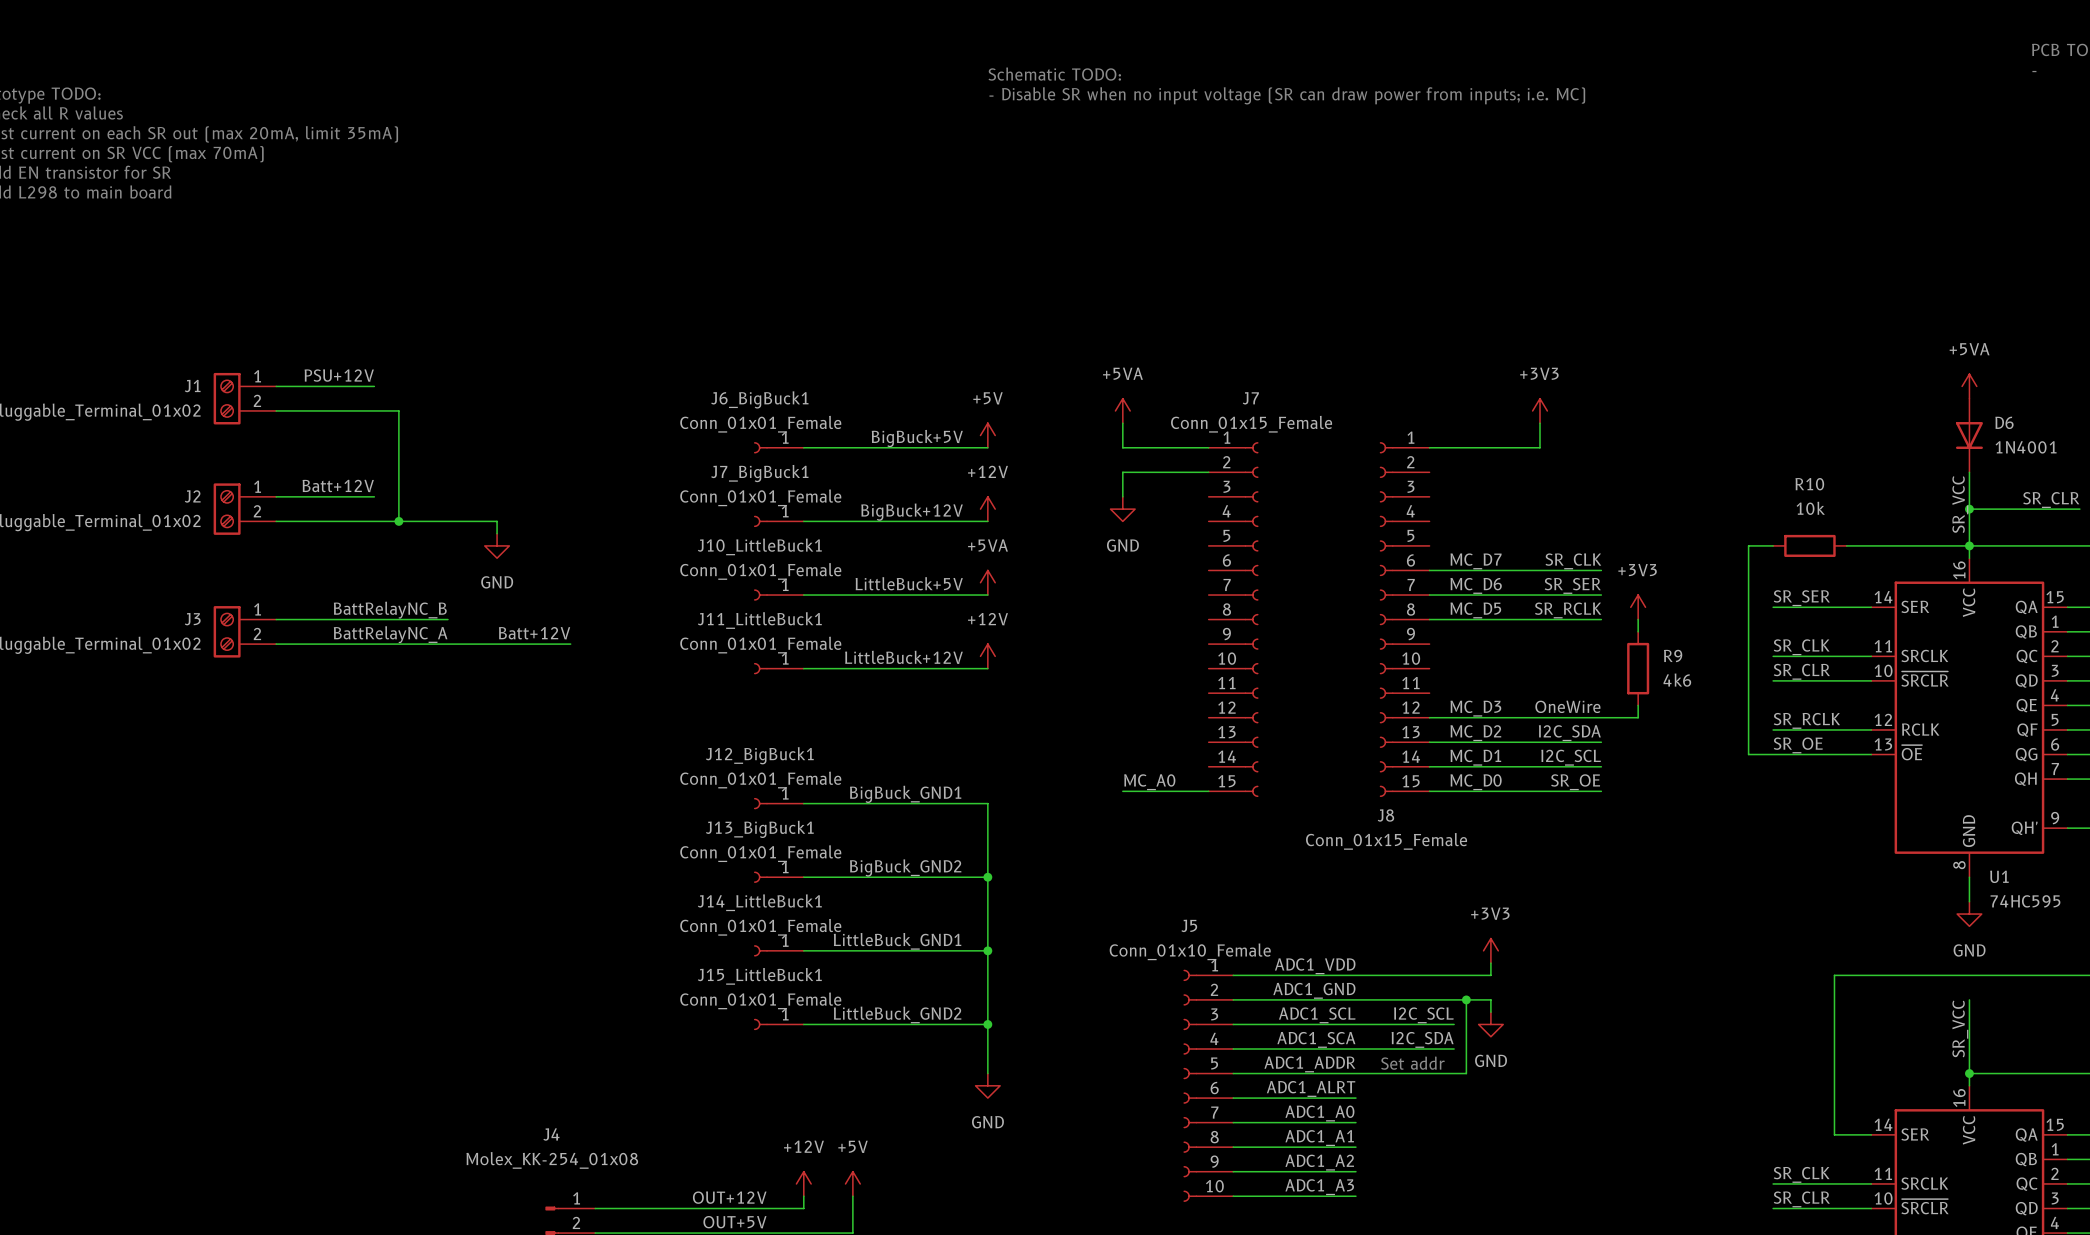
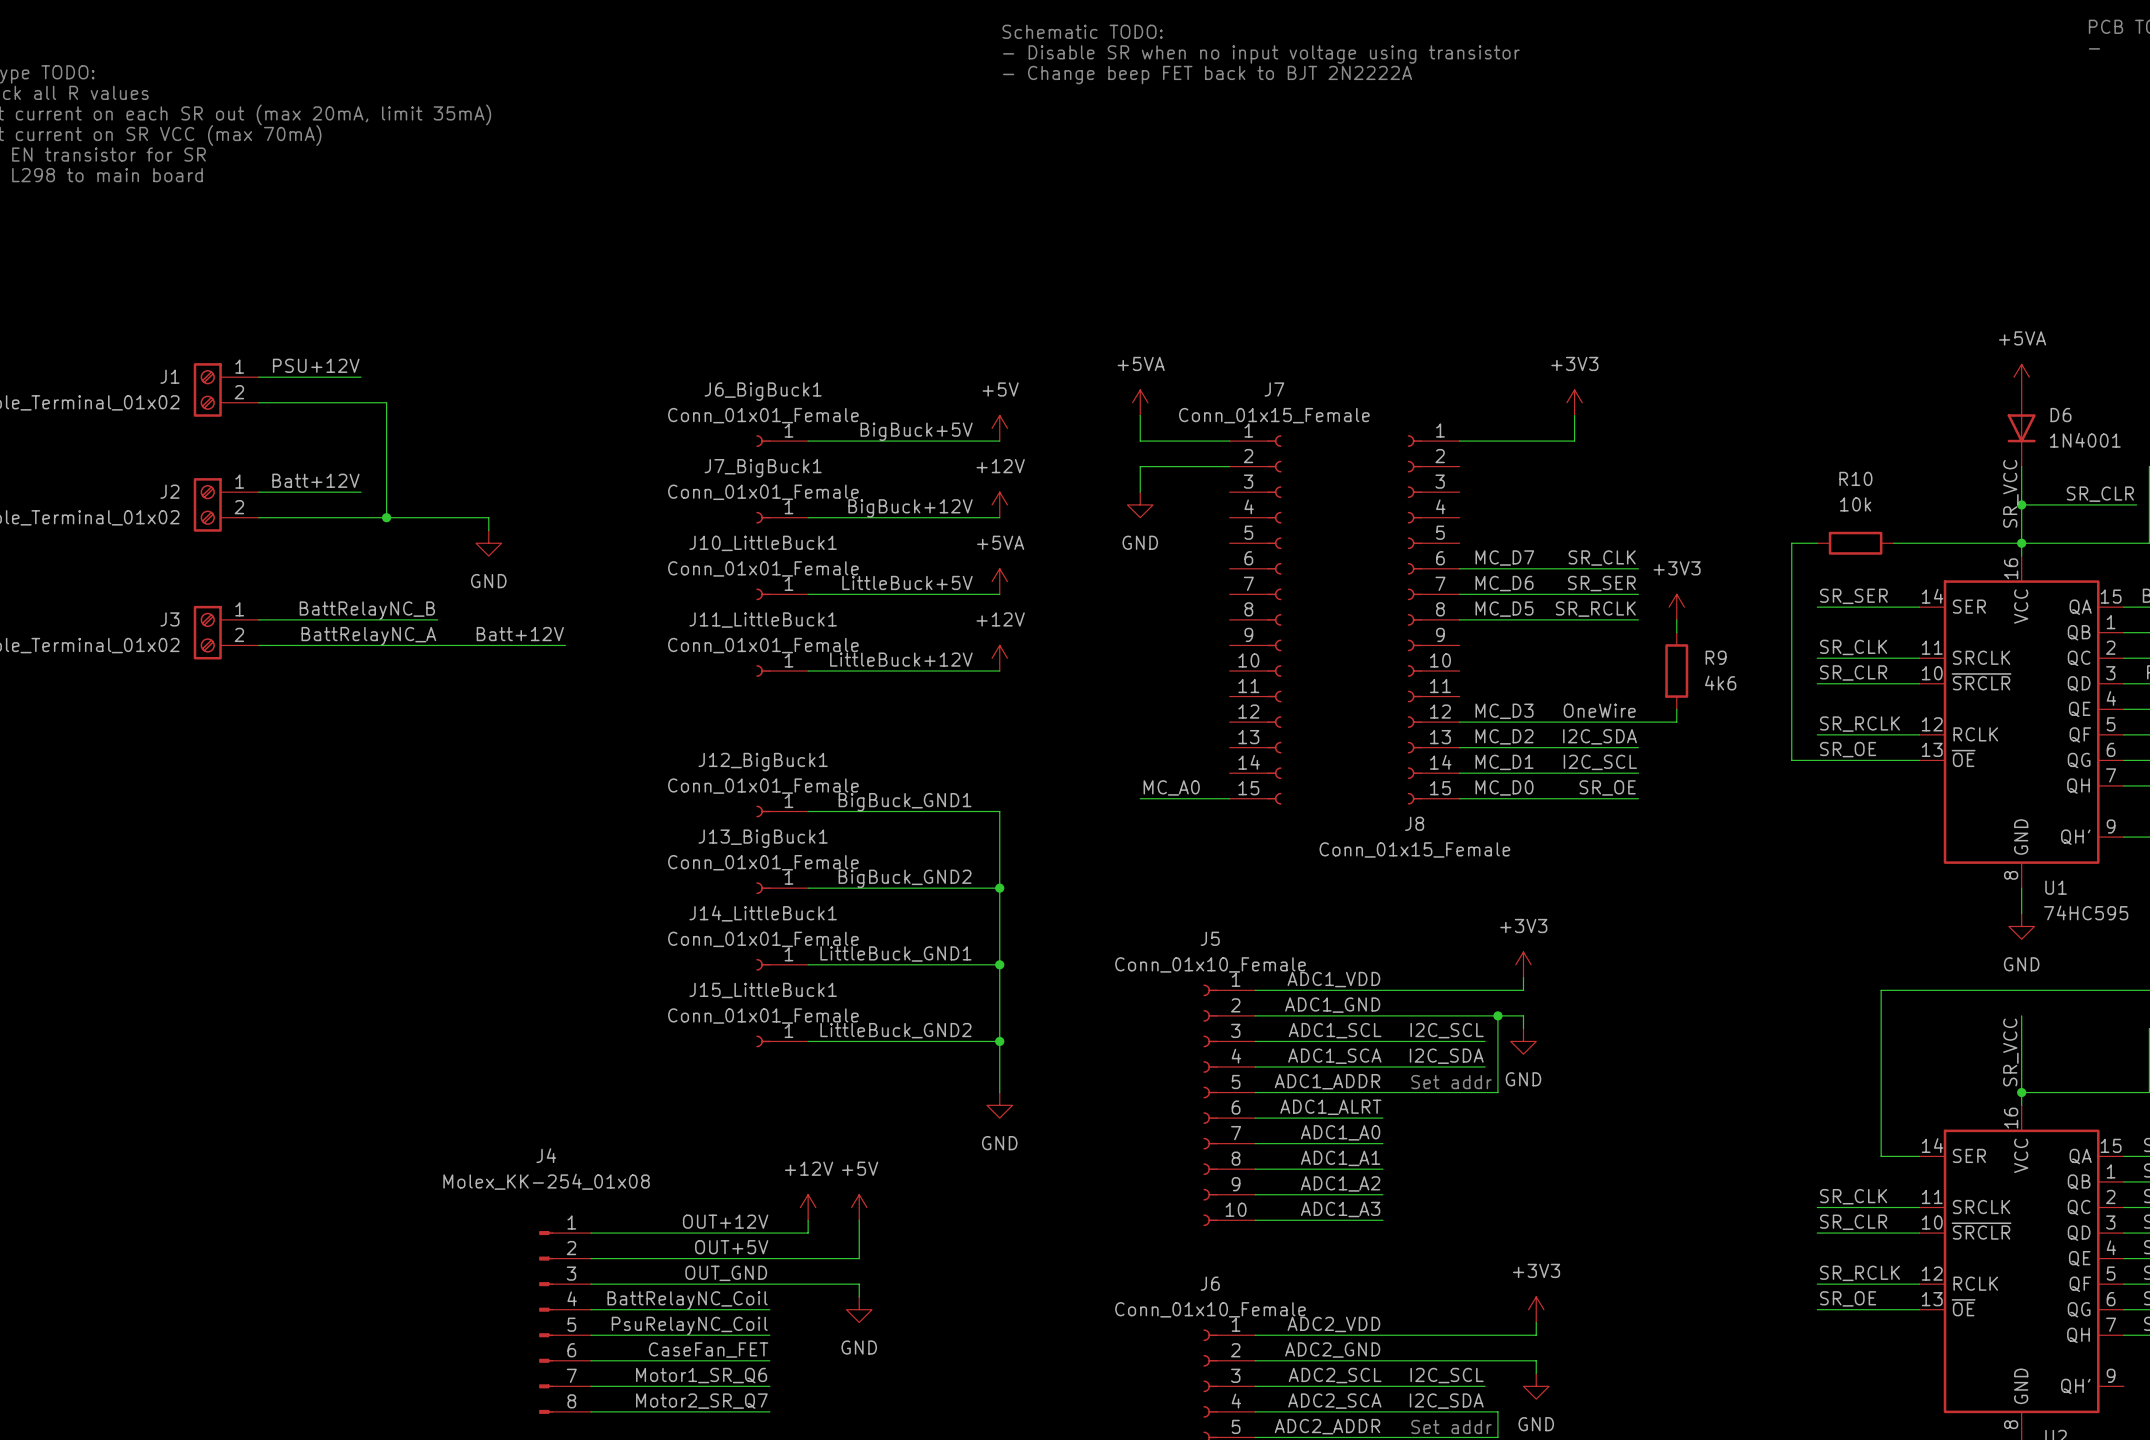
text: none -> Schematic TODO: (1082, 31)
text: Schematic TODO: (1054, 74) -> - Disable SR when no input voltage using transistor (1261, 54)
text: - Disable SR when no input voltage (SR can draw power from inputs; i.e. MC) (1287, 95) -> - Change beep FET back to BJT 2N2222A (1207, 75)

